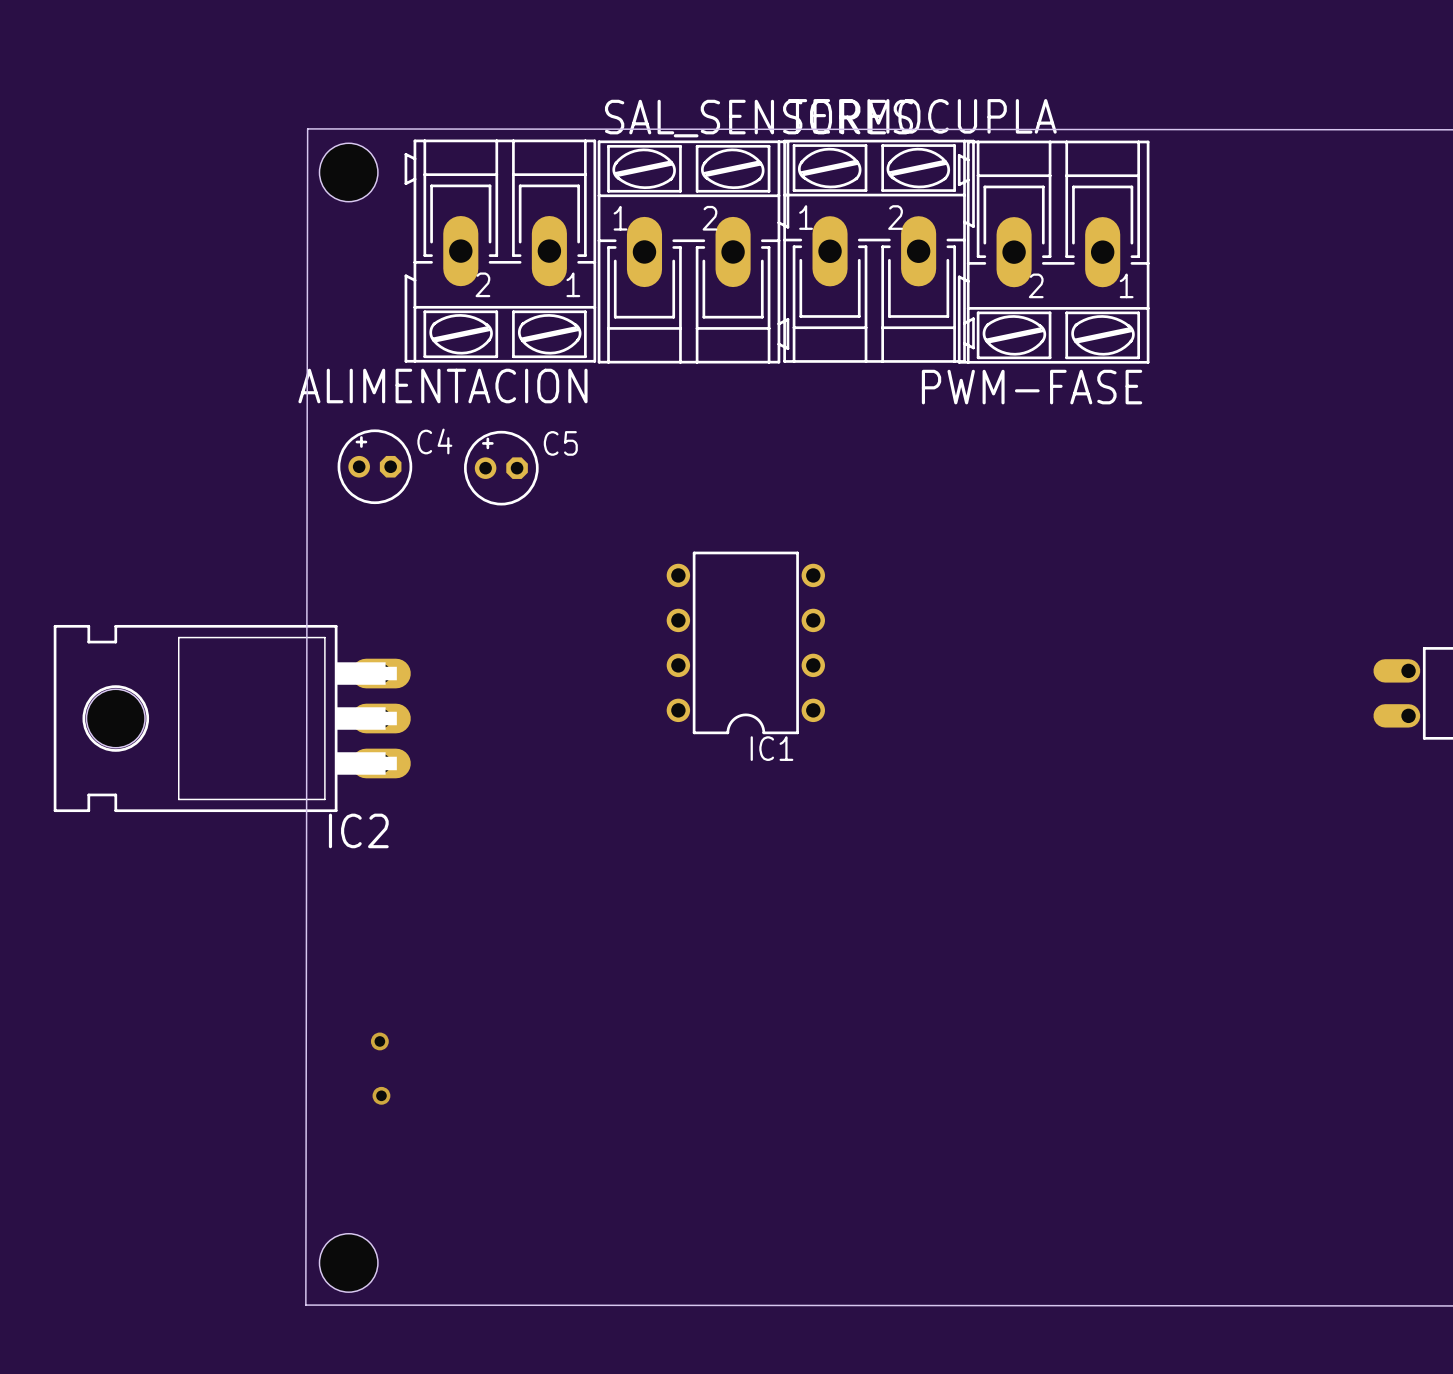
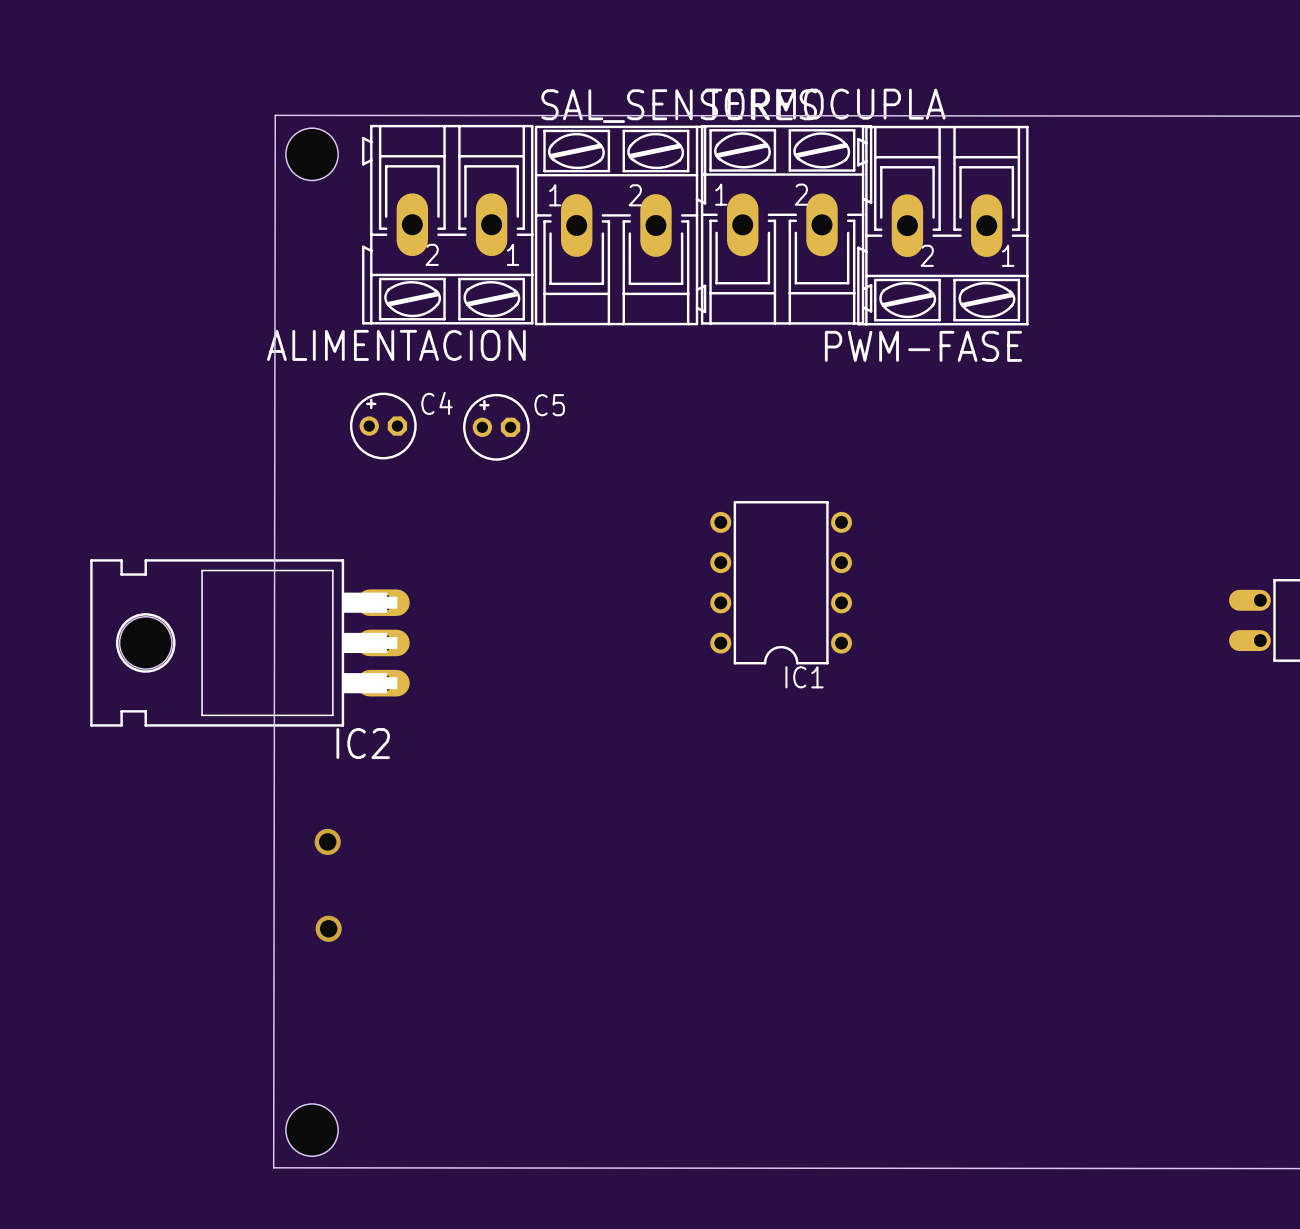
C4 position: (374, 466) -> (383, 426)
C5 position: (501, 468) -> (496, 427)
IC1 position: (745, 642) -> (781, 582)
IC2 position: (232, 718) -> (249, 642)
via: none -> (327, 841)
via size: [370, 1032, 389, 1051] -> [315, 915, 342, 942]
via: (381, 1095) -> none

